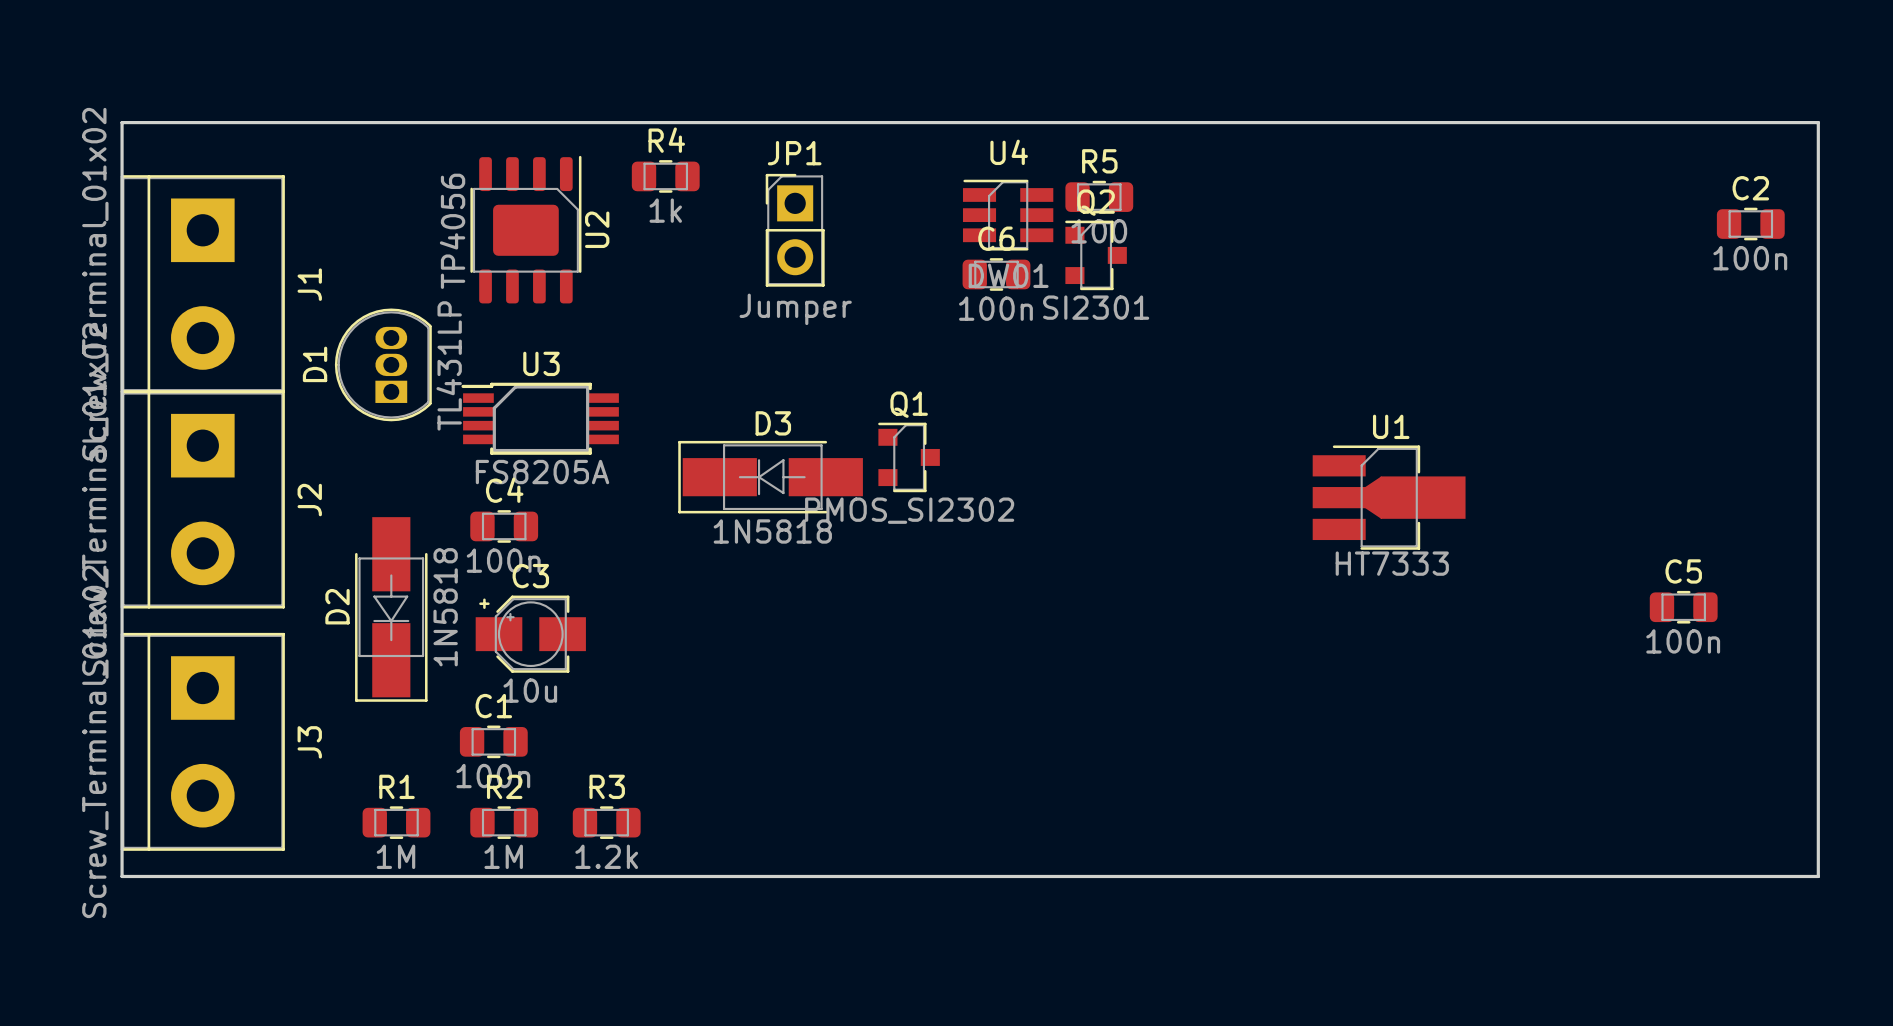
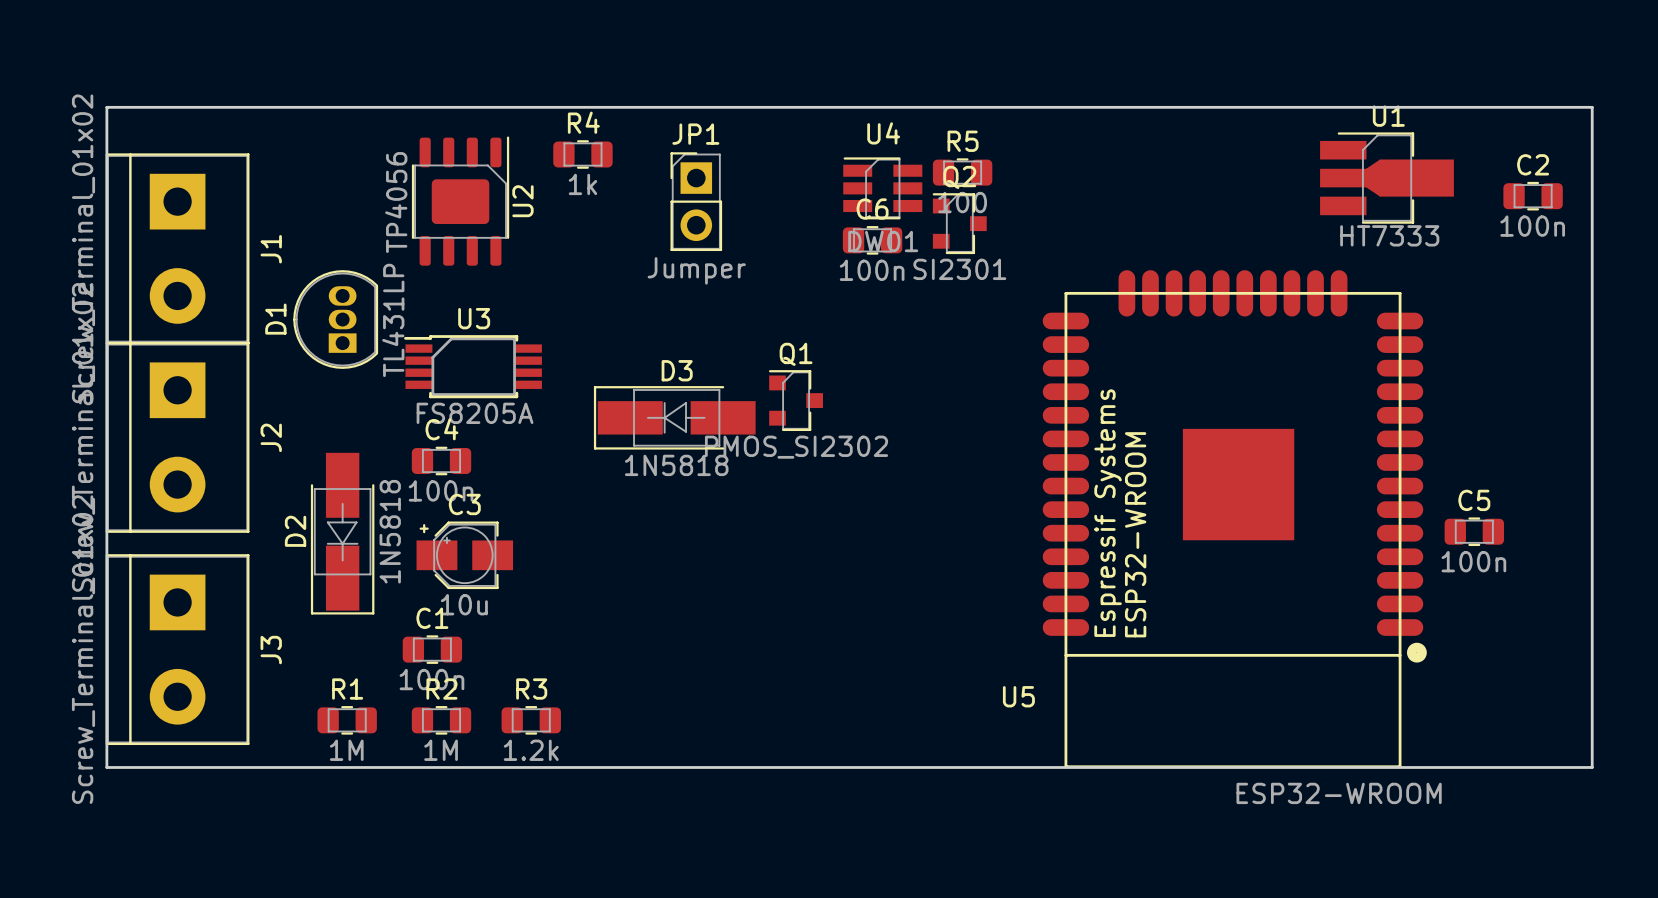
U1 position: (1389, 497) -> (1386, 178)
U5: none -> ESP32-WROOM (1234, 519)

